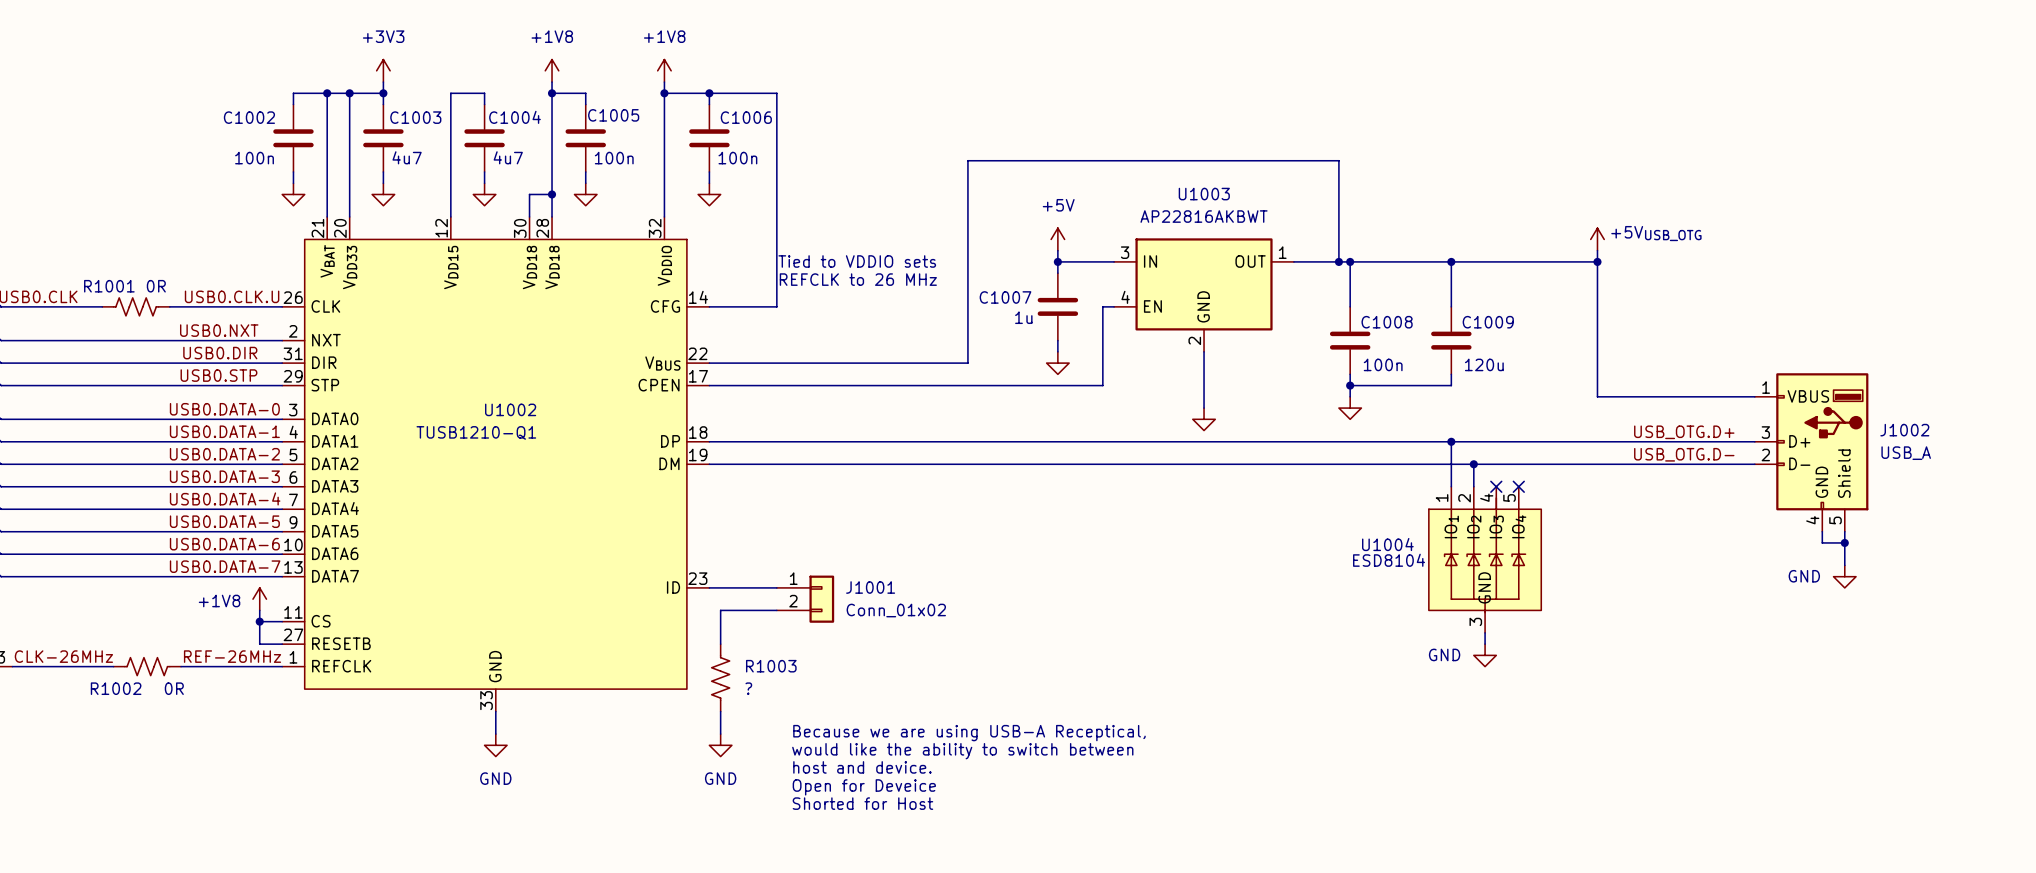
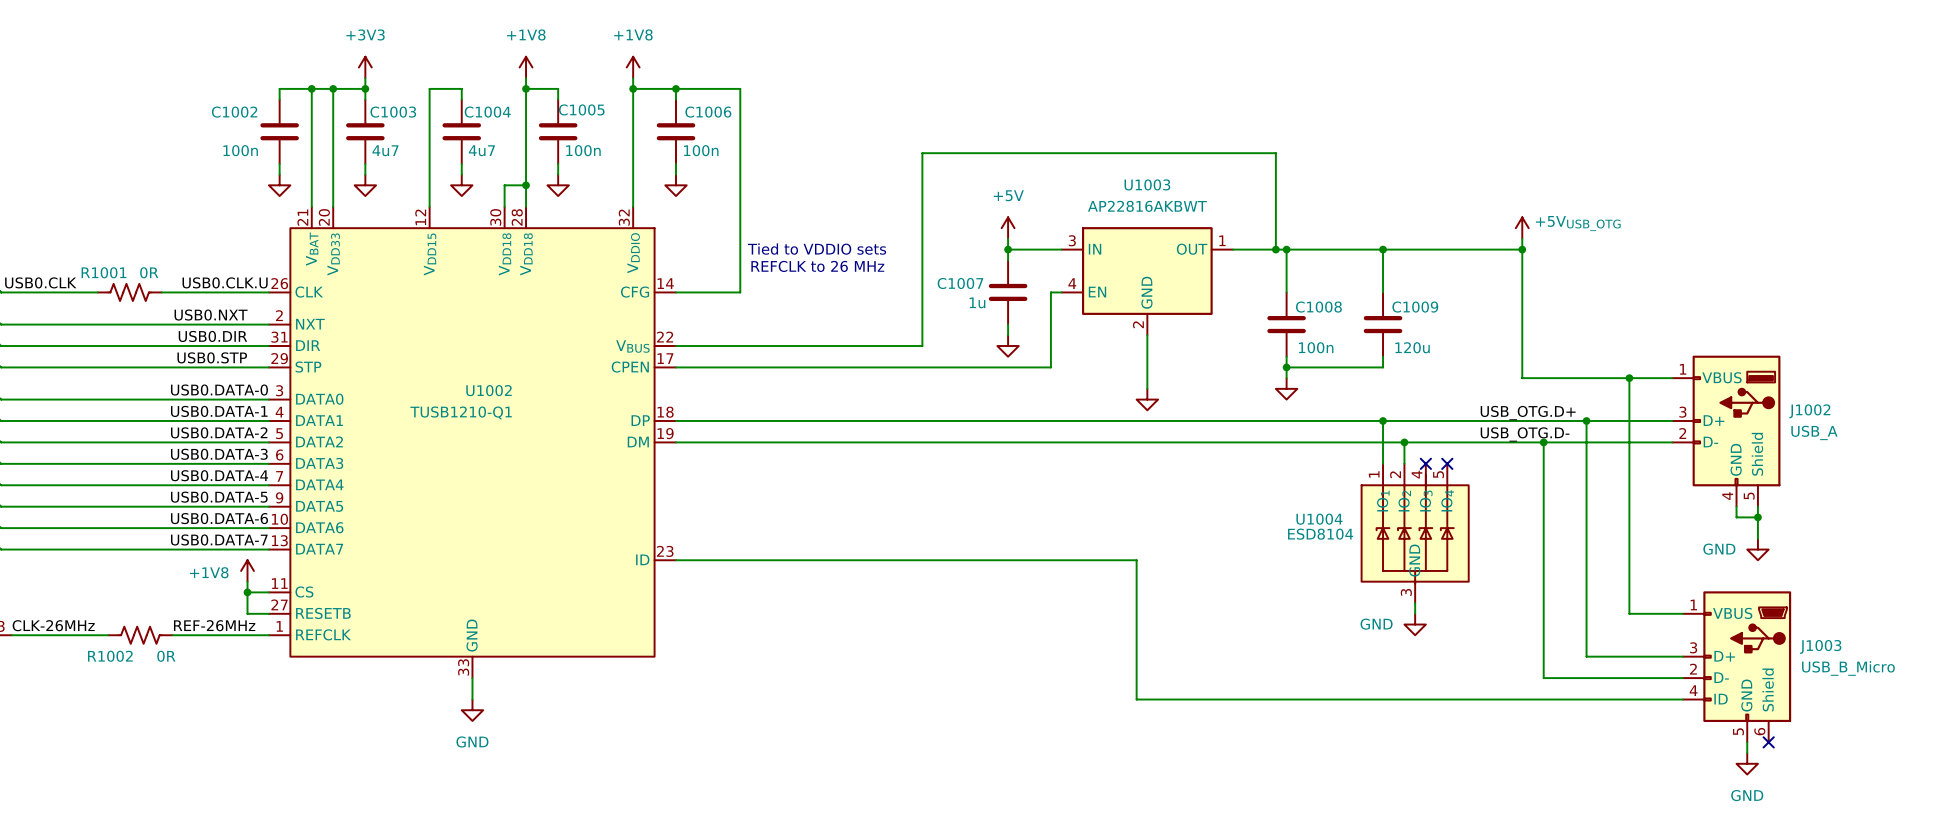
wire: none -> (1629, 378) (1629, 613) (1682, 613)
junction: none -> (1629, 378)
label position: USB_OTG.D+ (1684, 432) -> USB_OTG.D+ (1528, 413)
wire: none -> (1586, 420) (1586, 656) (1682, 656)
junction: none -> (1586, 420)
label position: USB_OTG.D- (1684, 454) -> USB_OTG.D- (1525, 434)
wire: none -> (1543, 442) (1543, 678) (1682, 678)
junction: none -> (1543, 442)
wire: none -> (740, 560) (1136, 560) (1136, 699) (1682, 699)
J1001: Conn_01x02 (805, 599) -> none
wire: (776, 610) (720, 610) (720, 644) -> none
R1003: ? (720, 677) -> none
J1003: none -> USB_B_Micro (1737, 666)
wire: (720, 711) (720, 734) -> none
text: Because we are using USB-A Receptical, (969, 733) -> none
power symbol: GND (720, 745) -> none
text: would like the ability to switch between (962, 751) -> none
text: host and device. (862, 767) -> none
wire: none -> (1747, 742) (1747, 753)
no-connect mark: none -> (1768, 742)
text: Open for Deveice (864, 787) -> none
power symbol: none -> GND (1747, 763)
text: Shorted for Host (862, 803) -> none

